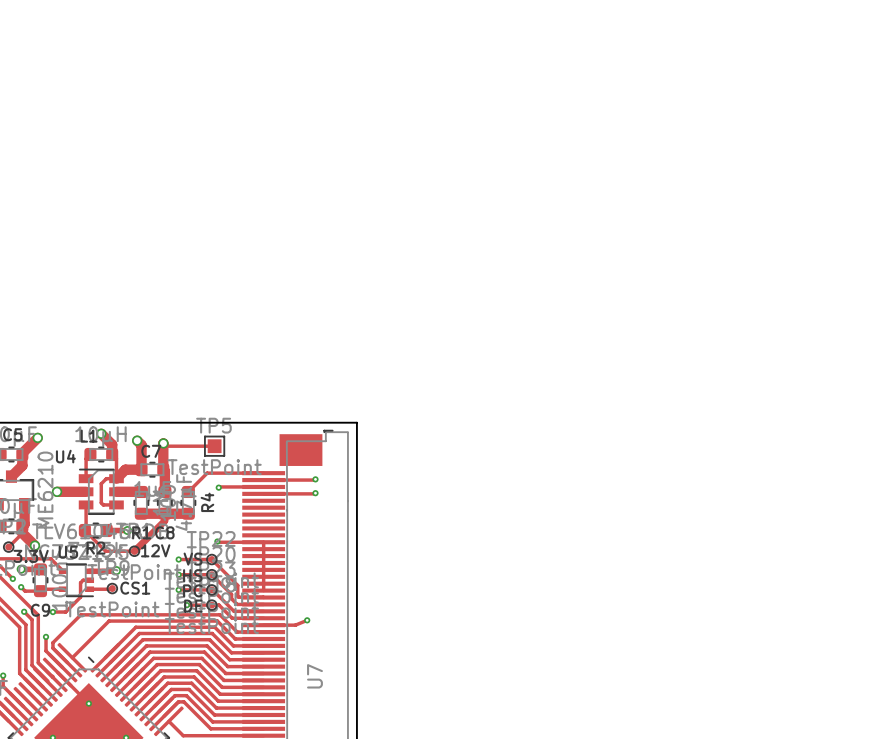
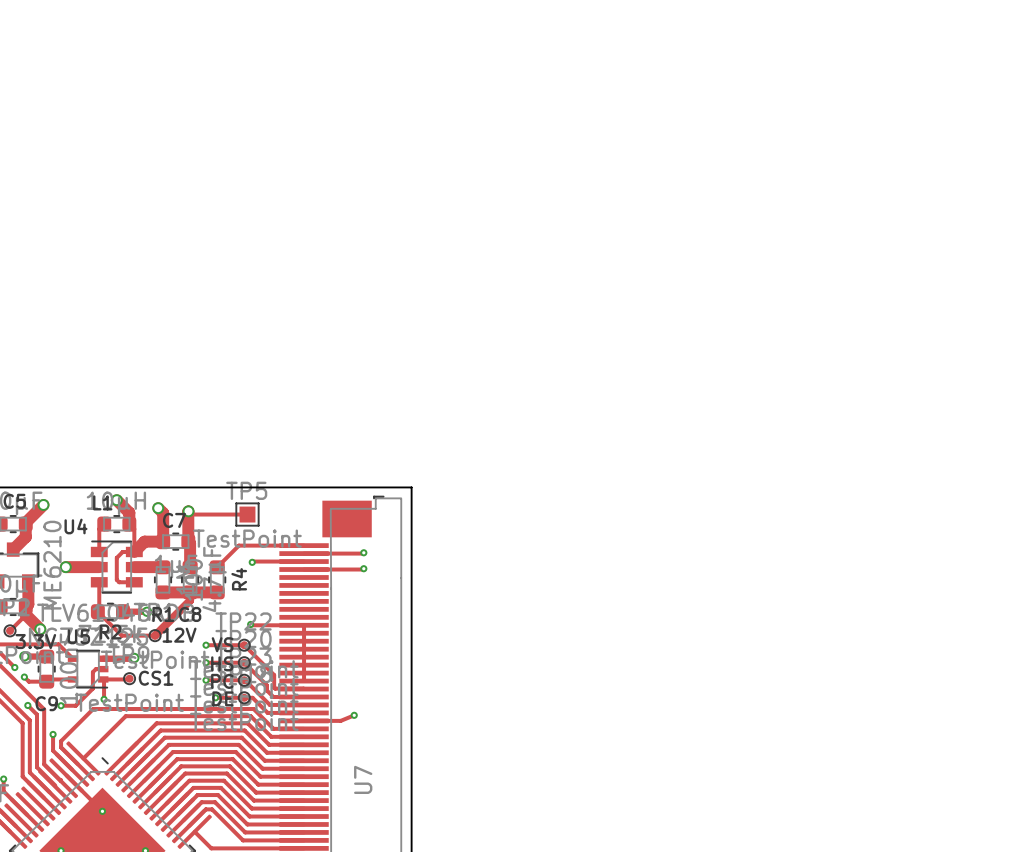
track: none -> (103, 679) (104, 699)
via: none -> (104, 699)

